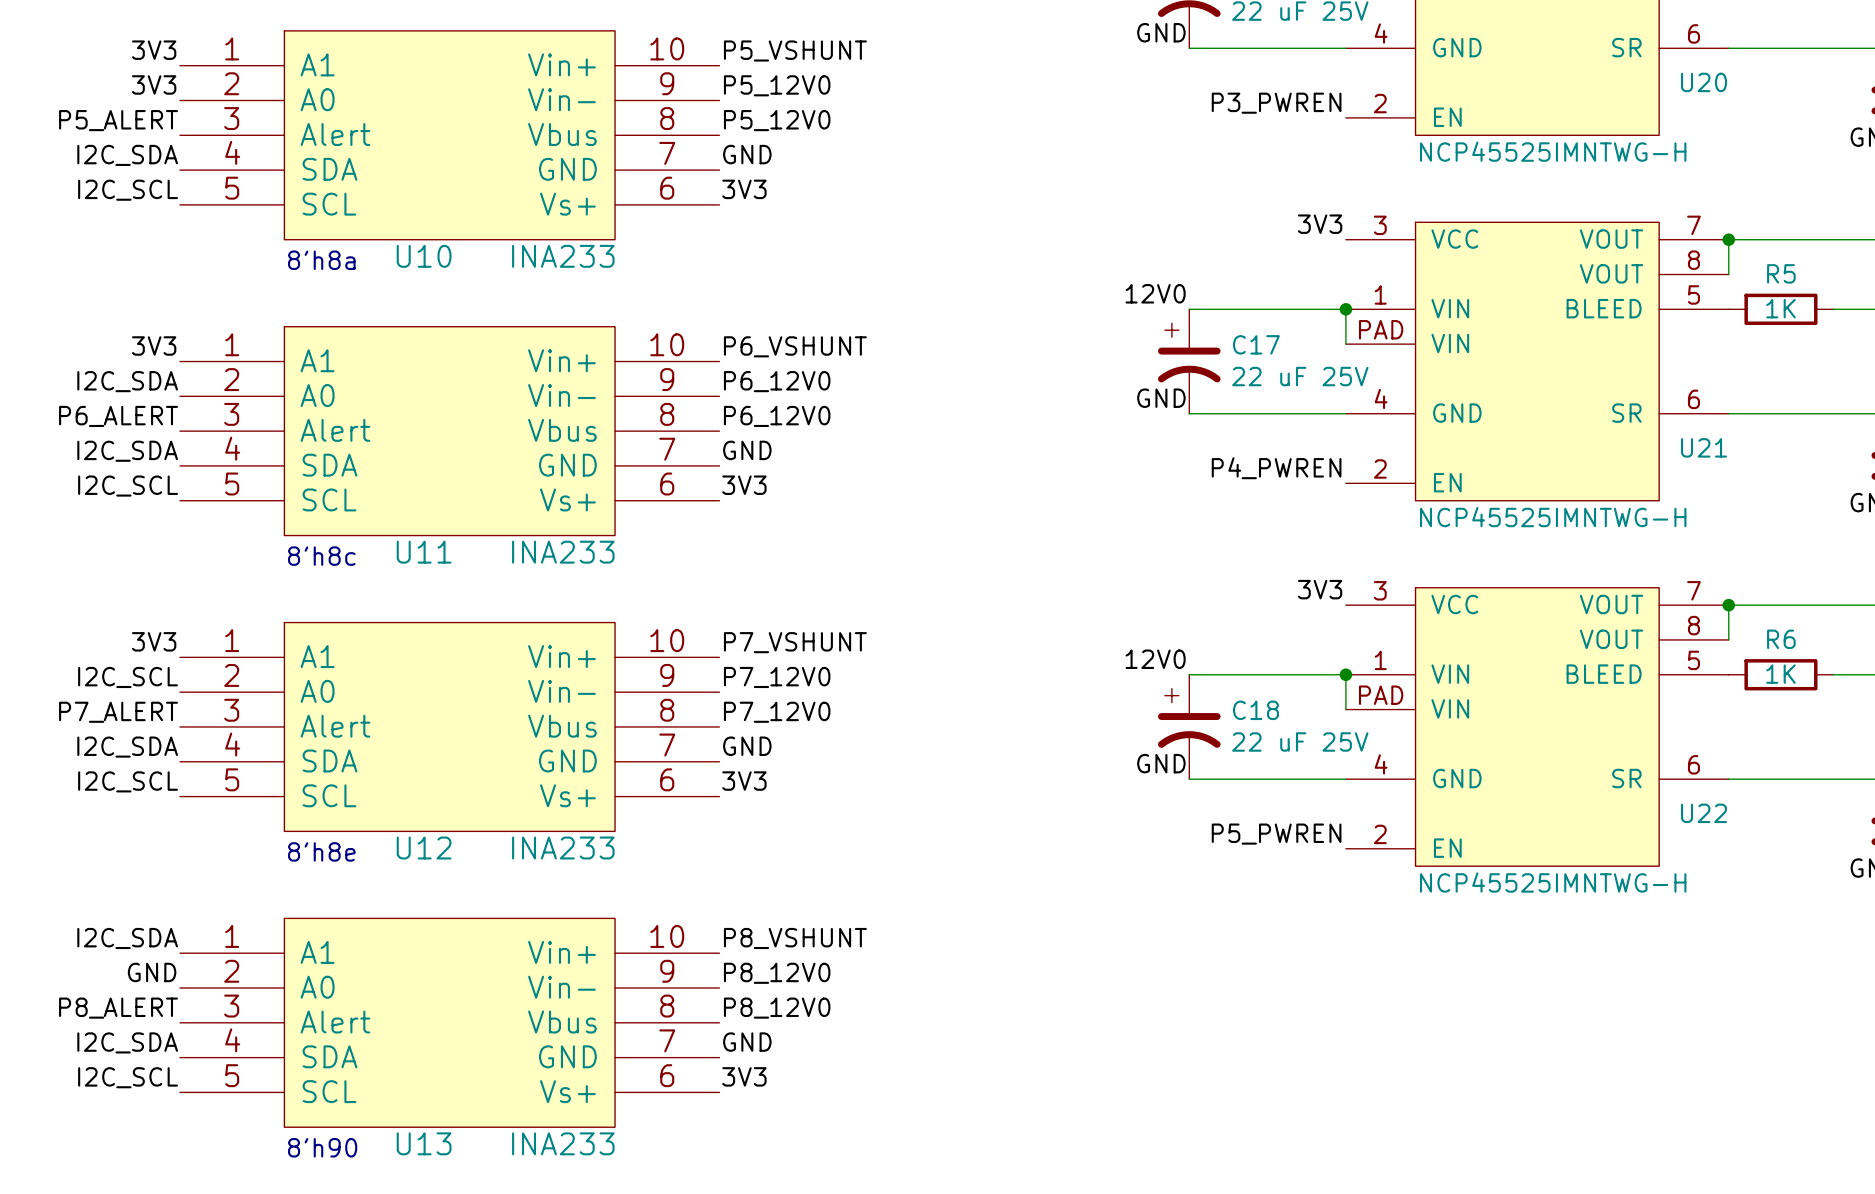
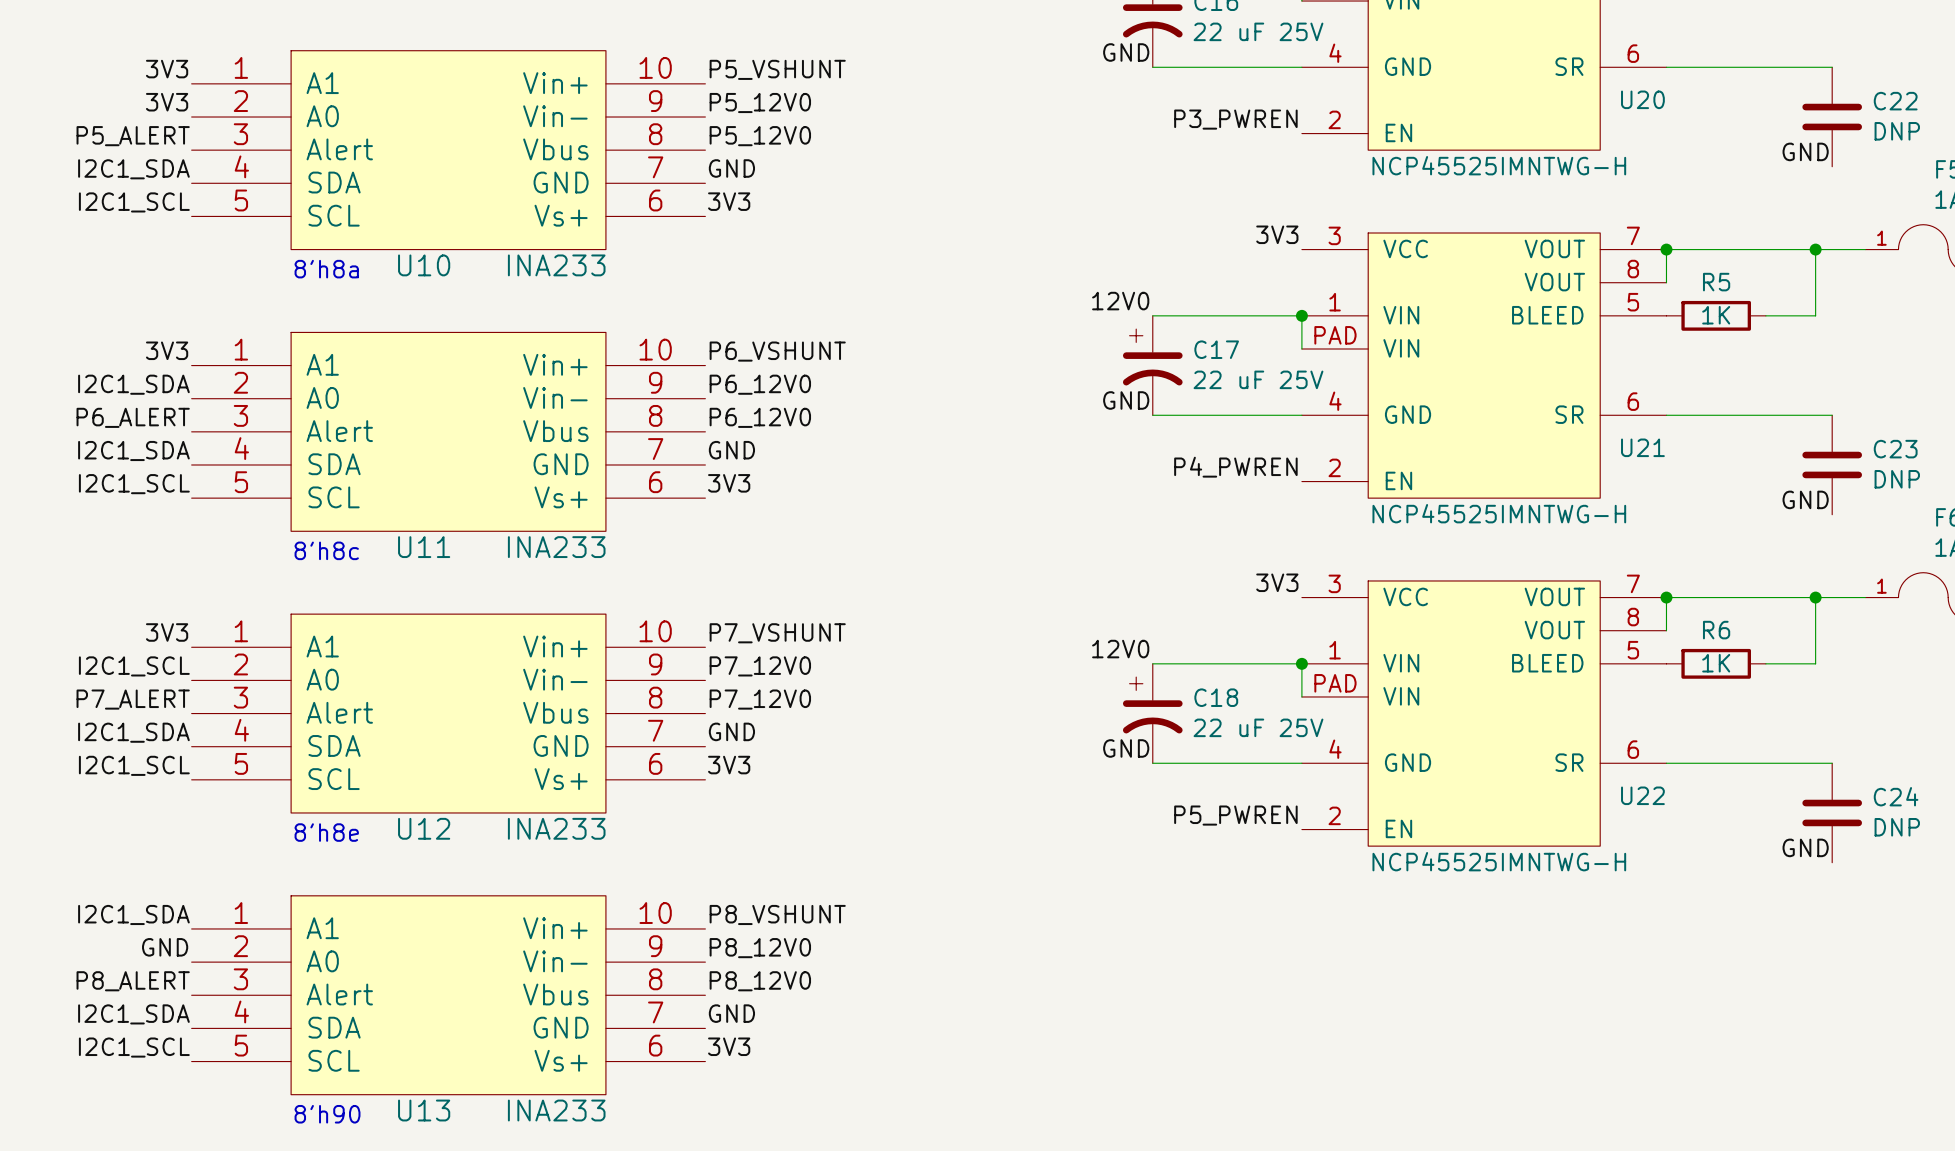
label: I2C_SDA (127, 155) -> I2C1_SDA (133, 169)
label: I2C_SCL (128, 190) -> I2C1_SCL (134, 202)
label: I2C_SDA (127, 381) -> I2C1_SDA (133, 384)
label: I2C_SDA (127, 451) -> I2C1_SDA (133, 450)
label: I2C_SCL (128, 486) -> I2C1_SCL (134, 484)
label: I2C_SCL (128, 677) -> I2C1_SCL (134, 666)
label: I2C_SDA (127, 747) -> I2C1_SDA (133, 732)
label: I2C_SCL (128, 781) -> I2C1_SCL (134, 765)
label: I2C_SDA (127, 938) -> I2C1_SDA (133, 914)
label: I2C_SDA (127, 1042) -> I2C1_SDA (133, 1014)
label: I2C_SCL (128, 1077) -> I2C1_SCL (134, 1047)

